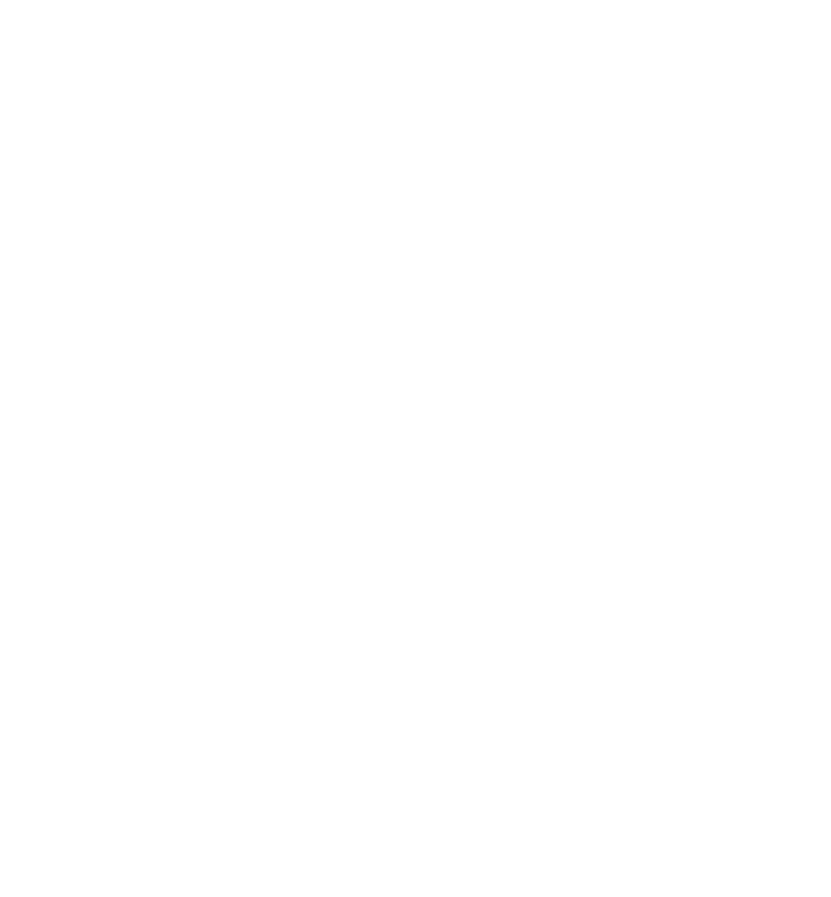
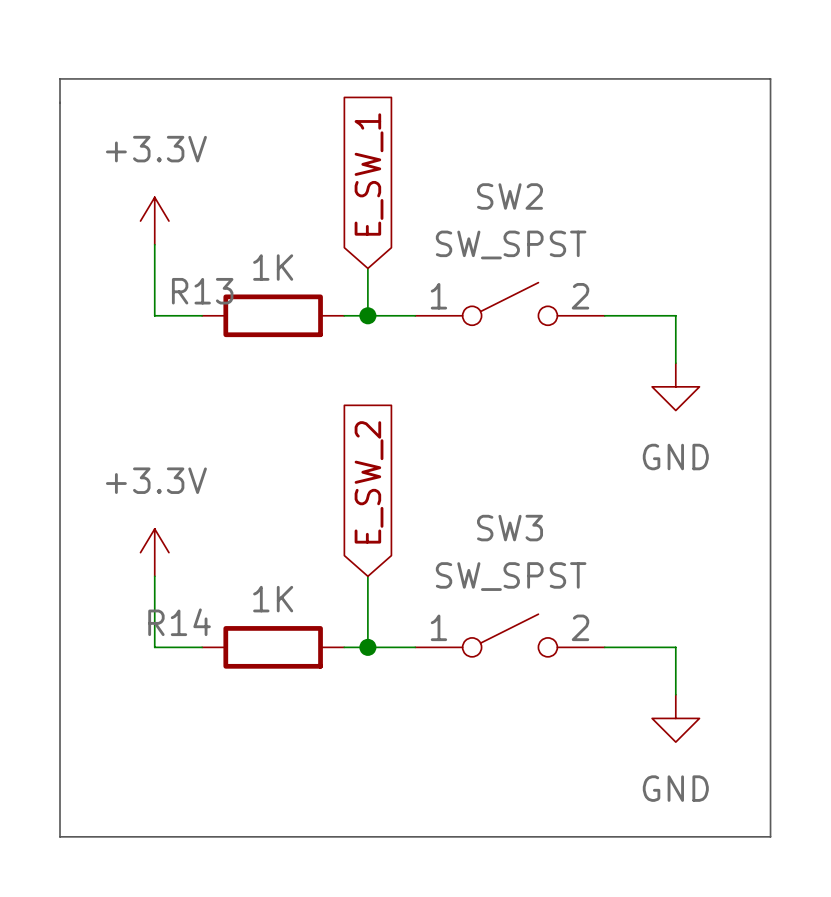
line: none -> (60, 78) (770, 78) (770, 836) (60, 836) (60, 78)
global label: none -> E_SW_1 (369, 174)
power symbol: none -> +3.3V (154, 221)
wire: none -> (154, 244) (154, 315) (202, 315)
wire: none -> (367, 268) (367, 315)
SW2: none -> SW_SPST (510, 303)
R13: none -> 1K (273, 315)
wire: none -> (344, 315) (415, 315)
junction: none -> (367, 315)
wire: none -> (604, 315) (675, 315) (675, 363)
power symbol: none -> GND (675, 386)
global label: none -> E_SW_2 (369, 482)
power symbol: none -> +3.3V (154, 552)
wire: none -> (154, 576) (154, 647) (202, 647)
wire: none -> (367, 576) (367, 647)
SW3: none -> SW_SPST (510, 635)
R14: none -> 1K (273, 647)
wire: none -> (344, 647) (415, 647)
junction: none -> (367, 647)
wire: none -> (604, 647) (675, 647) (675, 694)
power symbol: none -> GND (675, 718)

